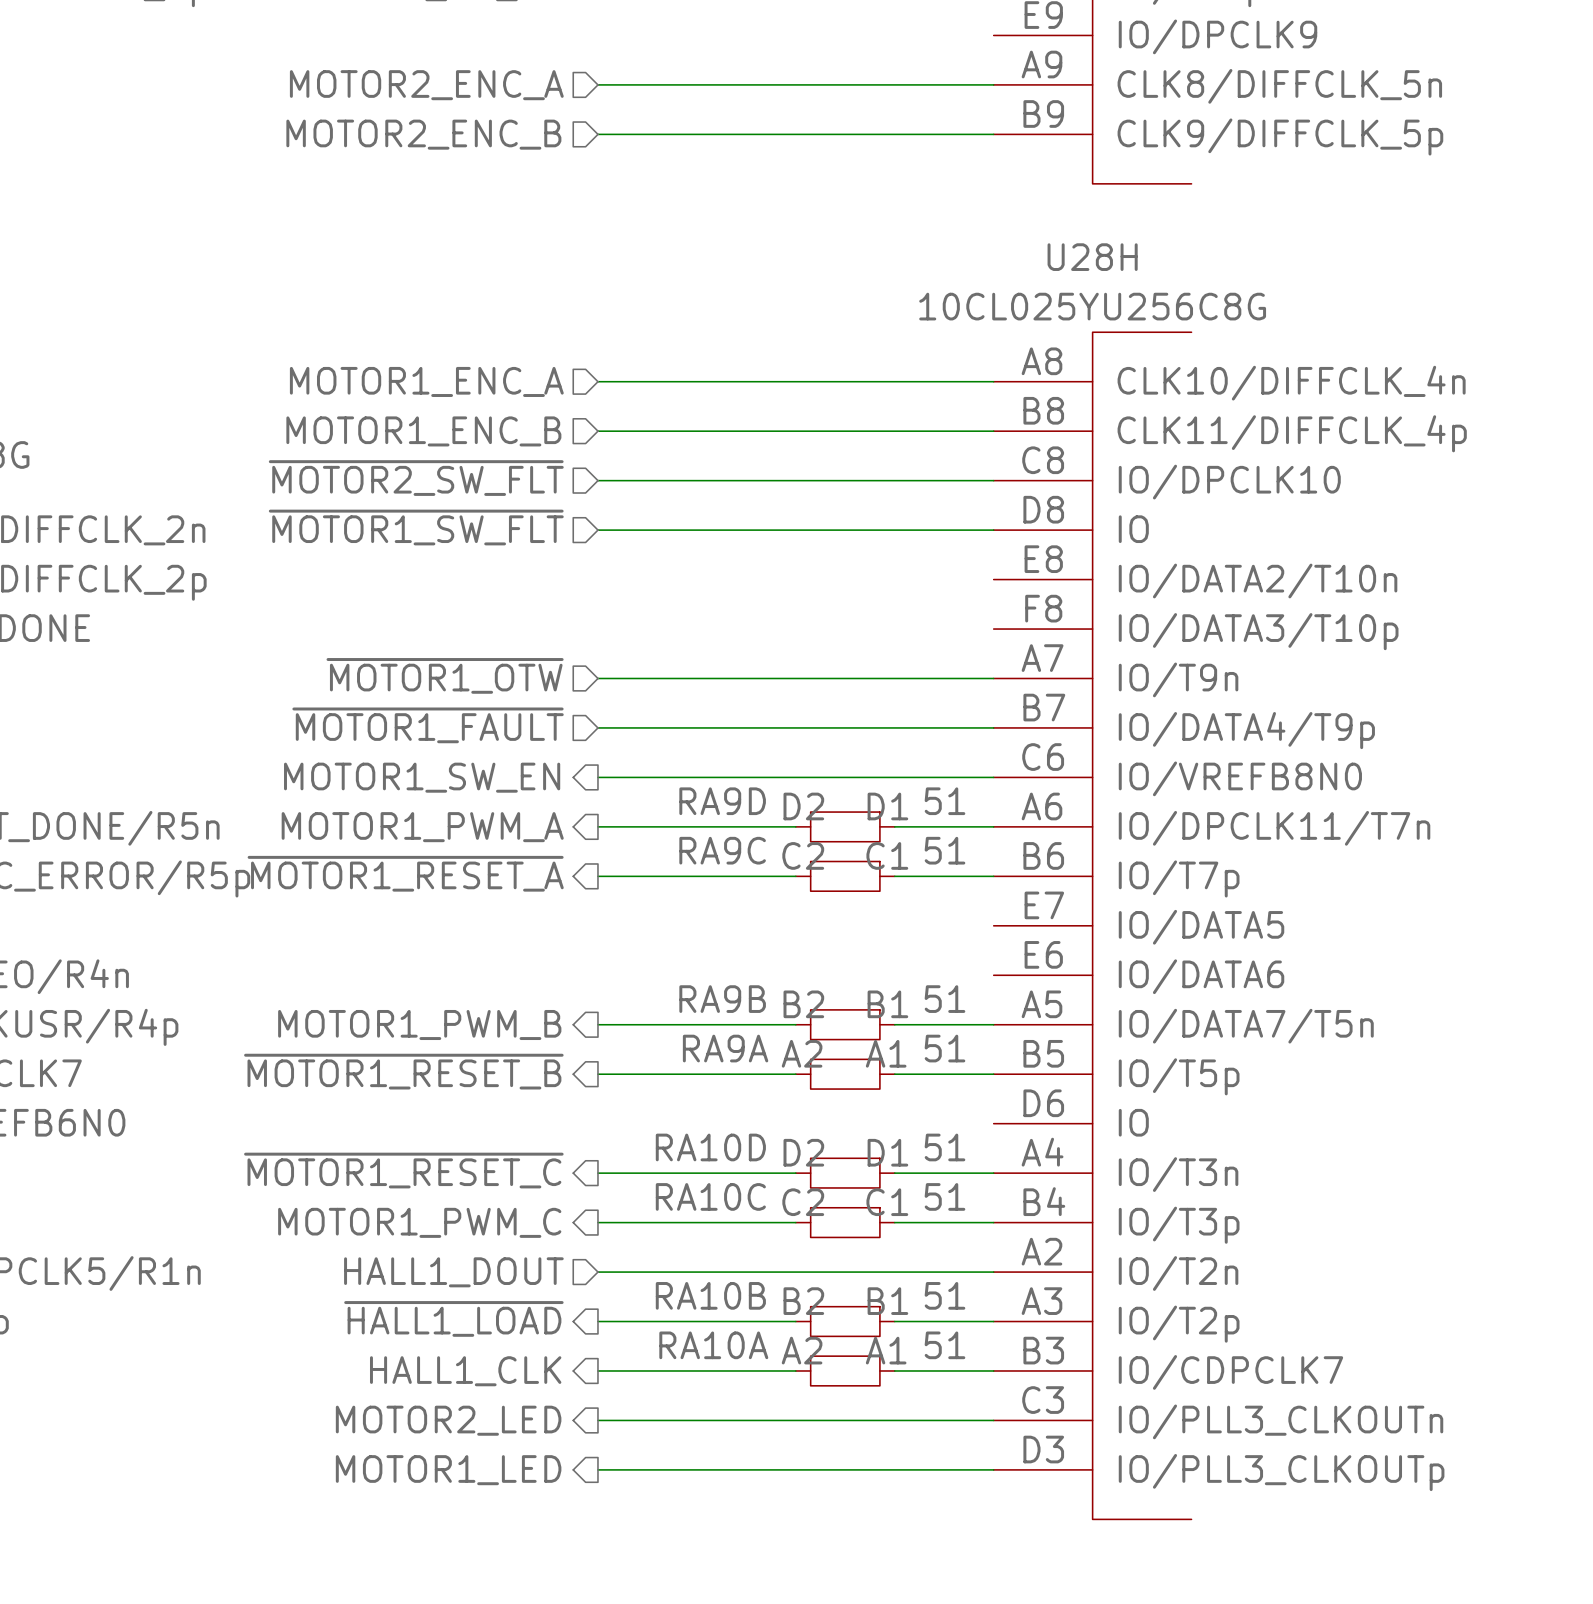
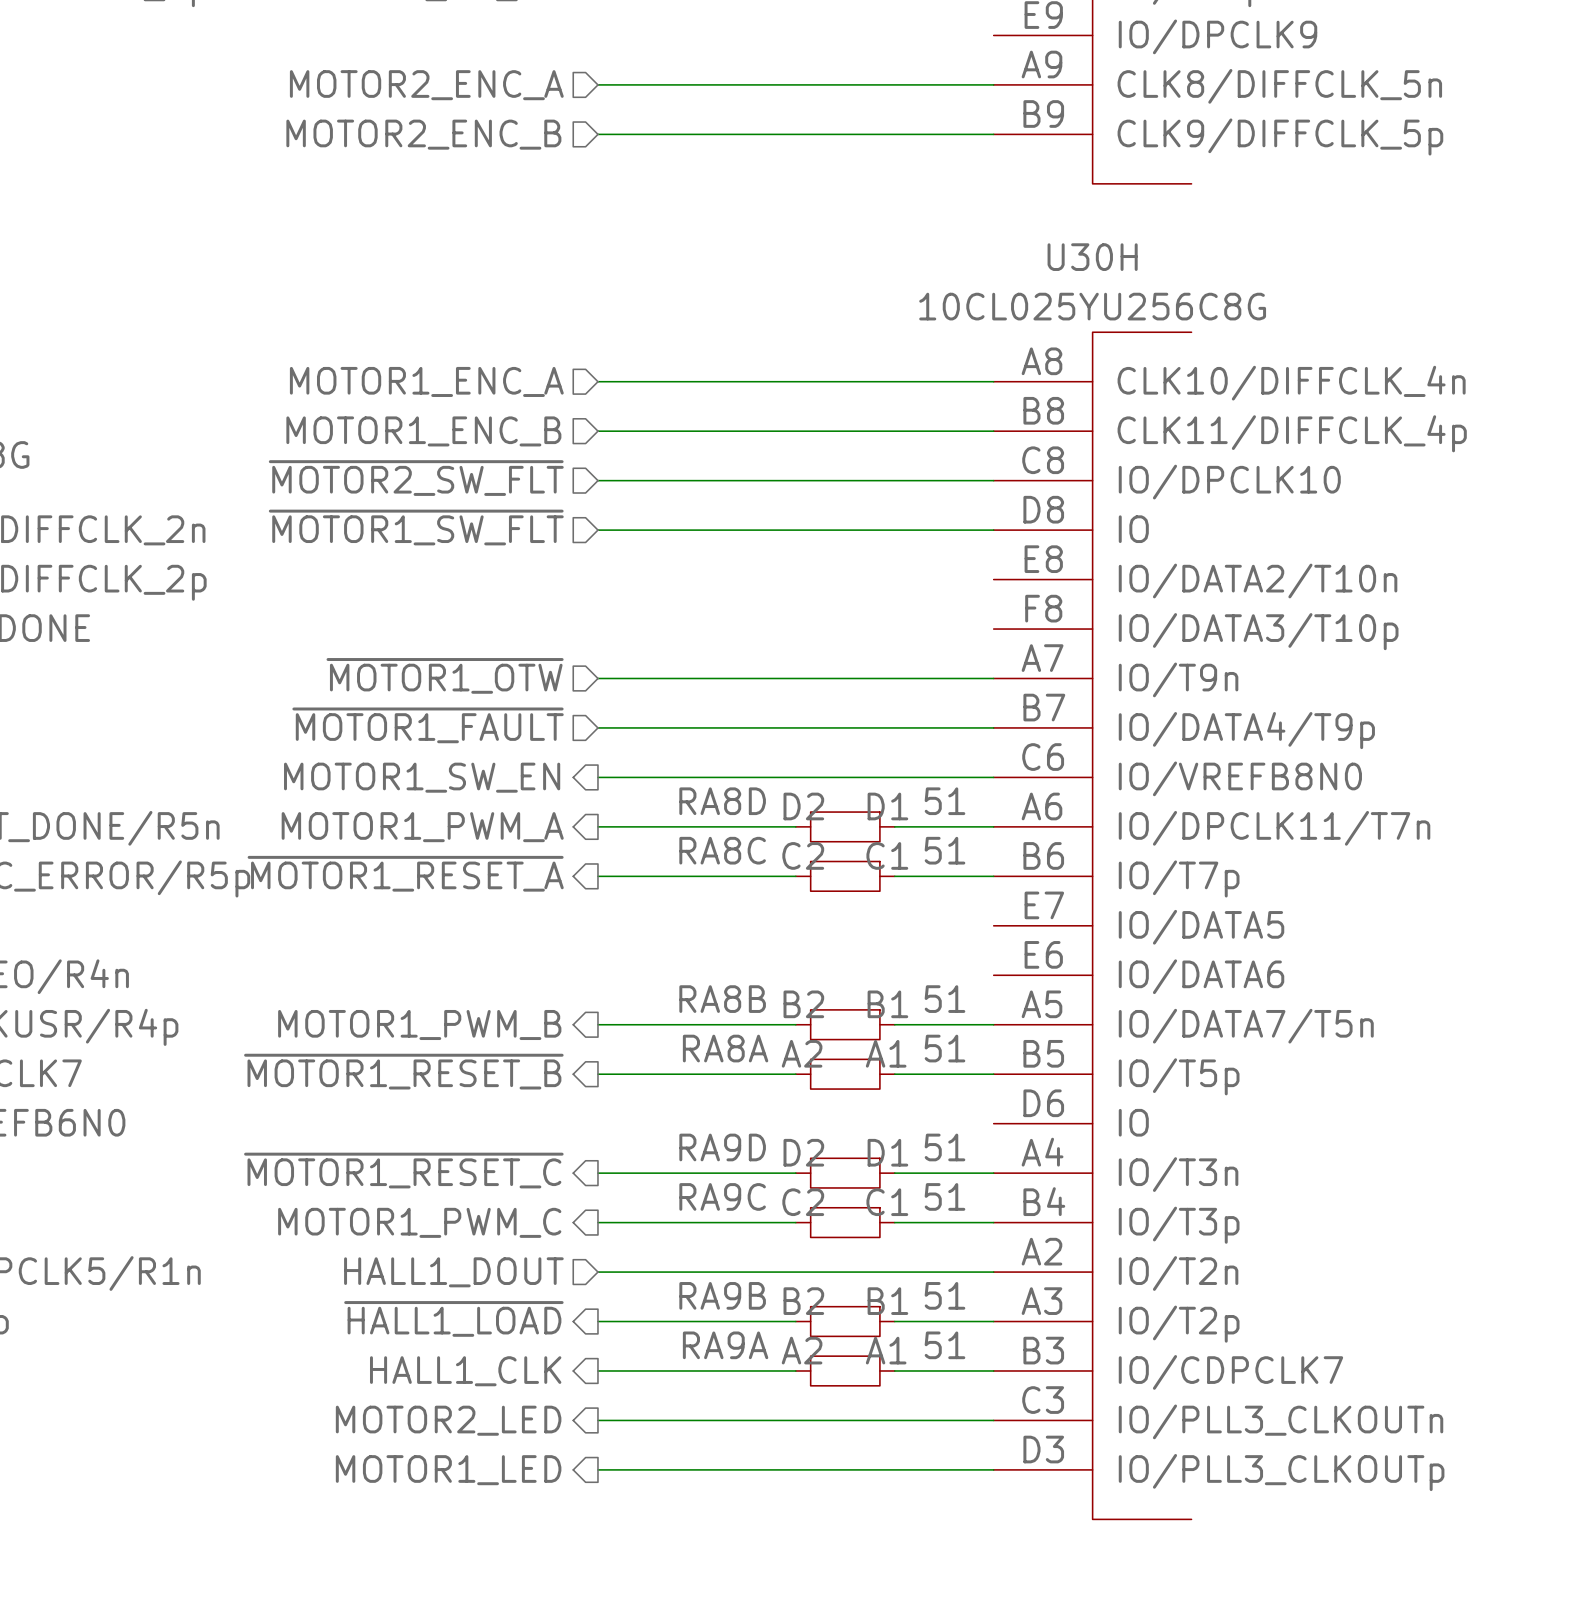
U28H name: U28H (1092, 257) -> U30H (1092, 257)
RA9D name: RA9D (722, 801) -> RA8D (722, 801)
RA9C name: RA9C (722, 850) -> RA8C (722, 850)
RA9B name: RA9B (722, 999) -> RA8B (722, 999)
RA9A name: RA9A (725, 1048) -> RA8A (725, 1048)
RA10D name: RA10D (710, 1147) -> RA9D (722, 1147)
RA10C name: RA10C (710, 1196) -> RA9C (722, 1196)
RA10B name: RA10B (710, 1295) -> RA9B (722, 1295)
RA10A name: RA10A (713, 1345) -> RA9A (725, 1345)

